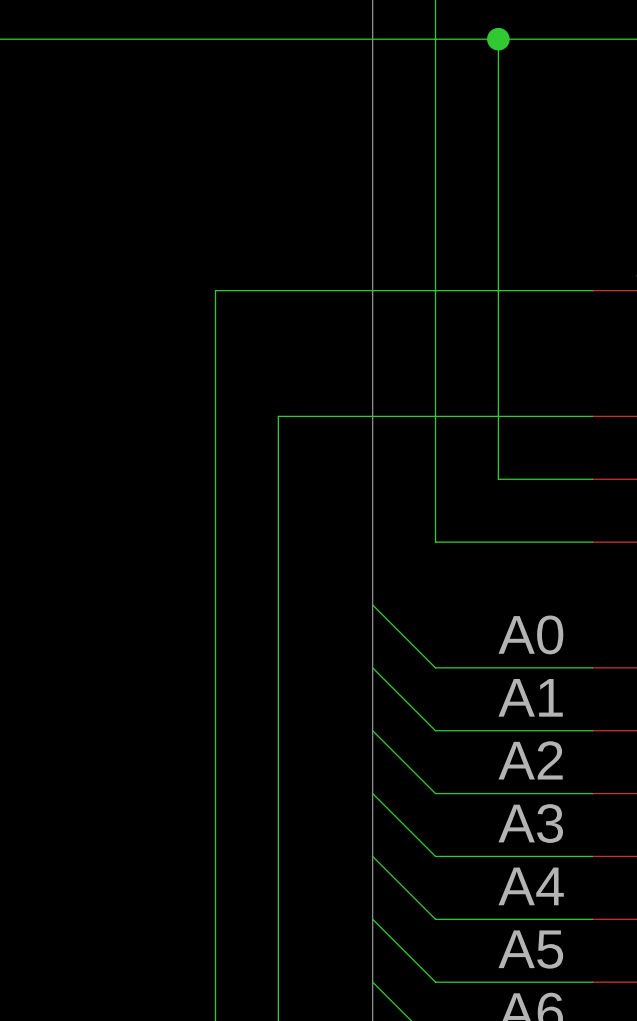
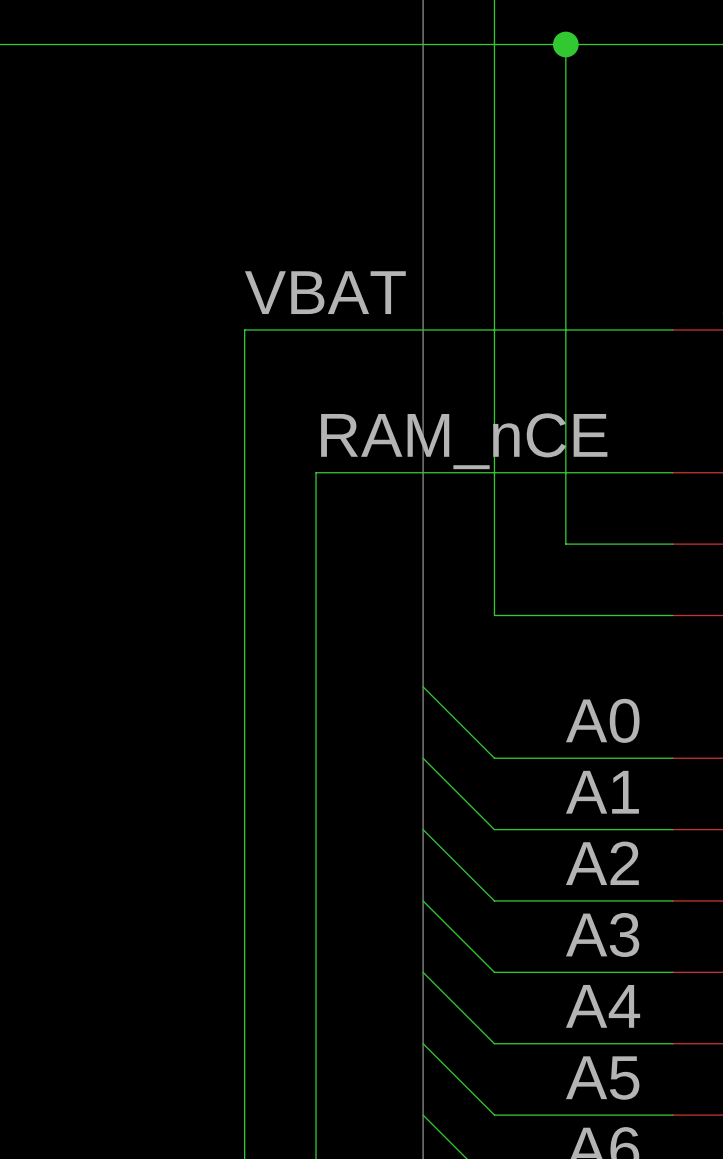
label: none -> VBAT (325, 292)
label: none -> RAM_nCE (464, 441)

